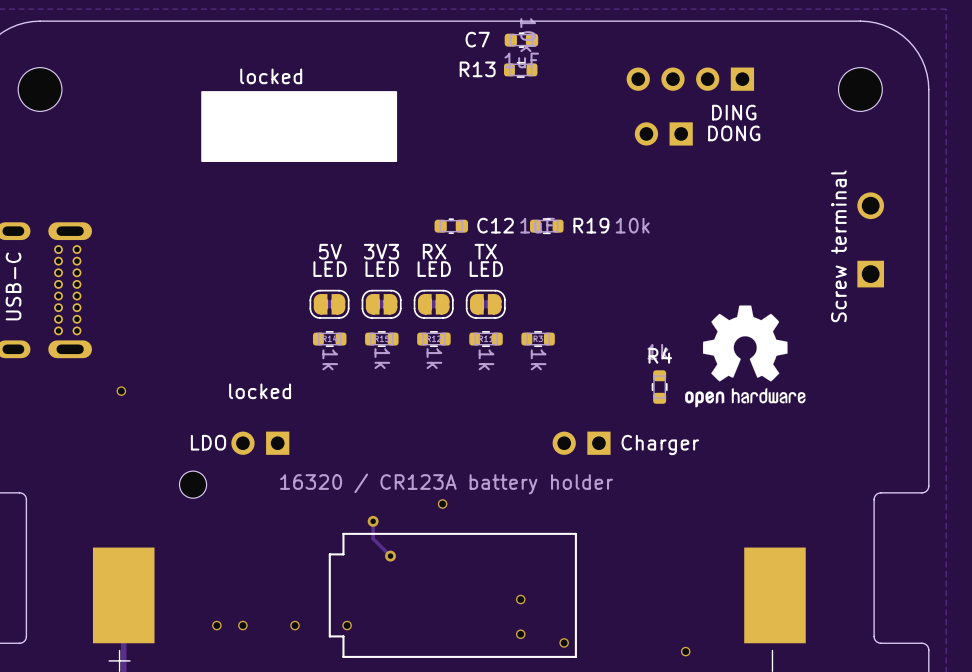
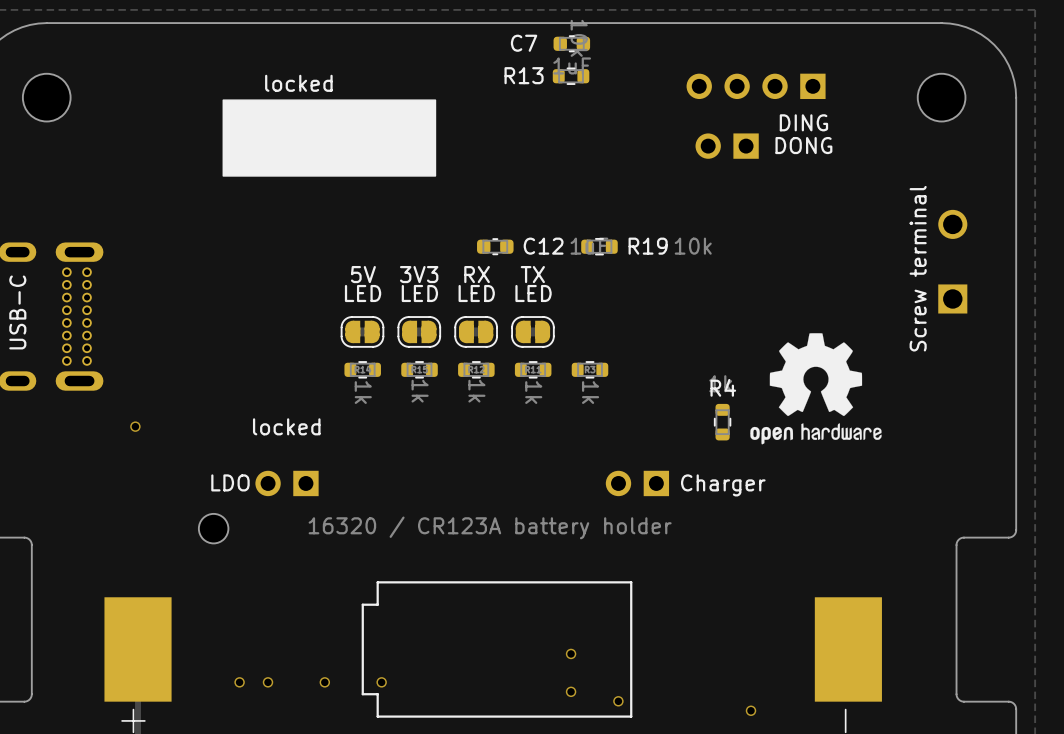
via: (442, 504) -> none
track: (373, 521) (373, 538) (390, 556) -> none
via: (373, 521) -> none
via: (390, 556) -> none

